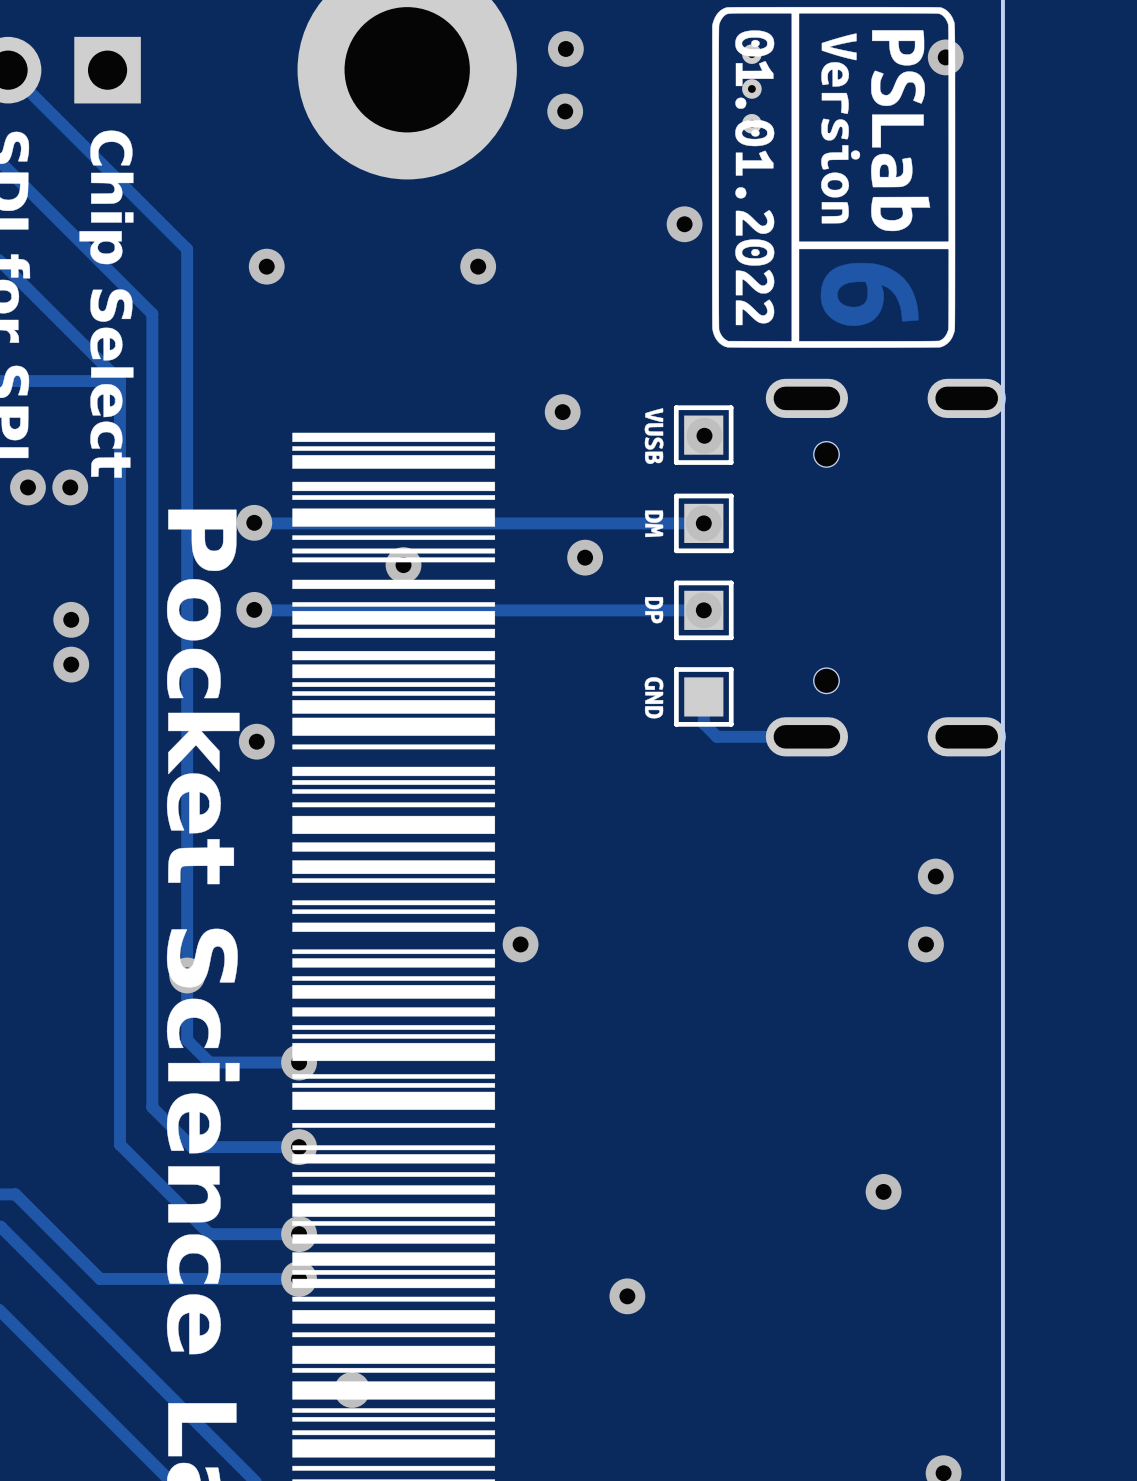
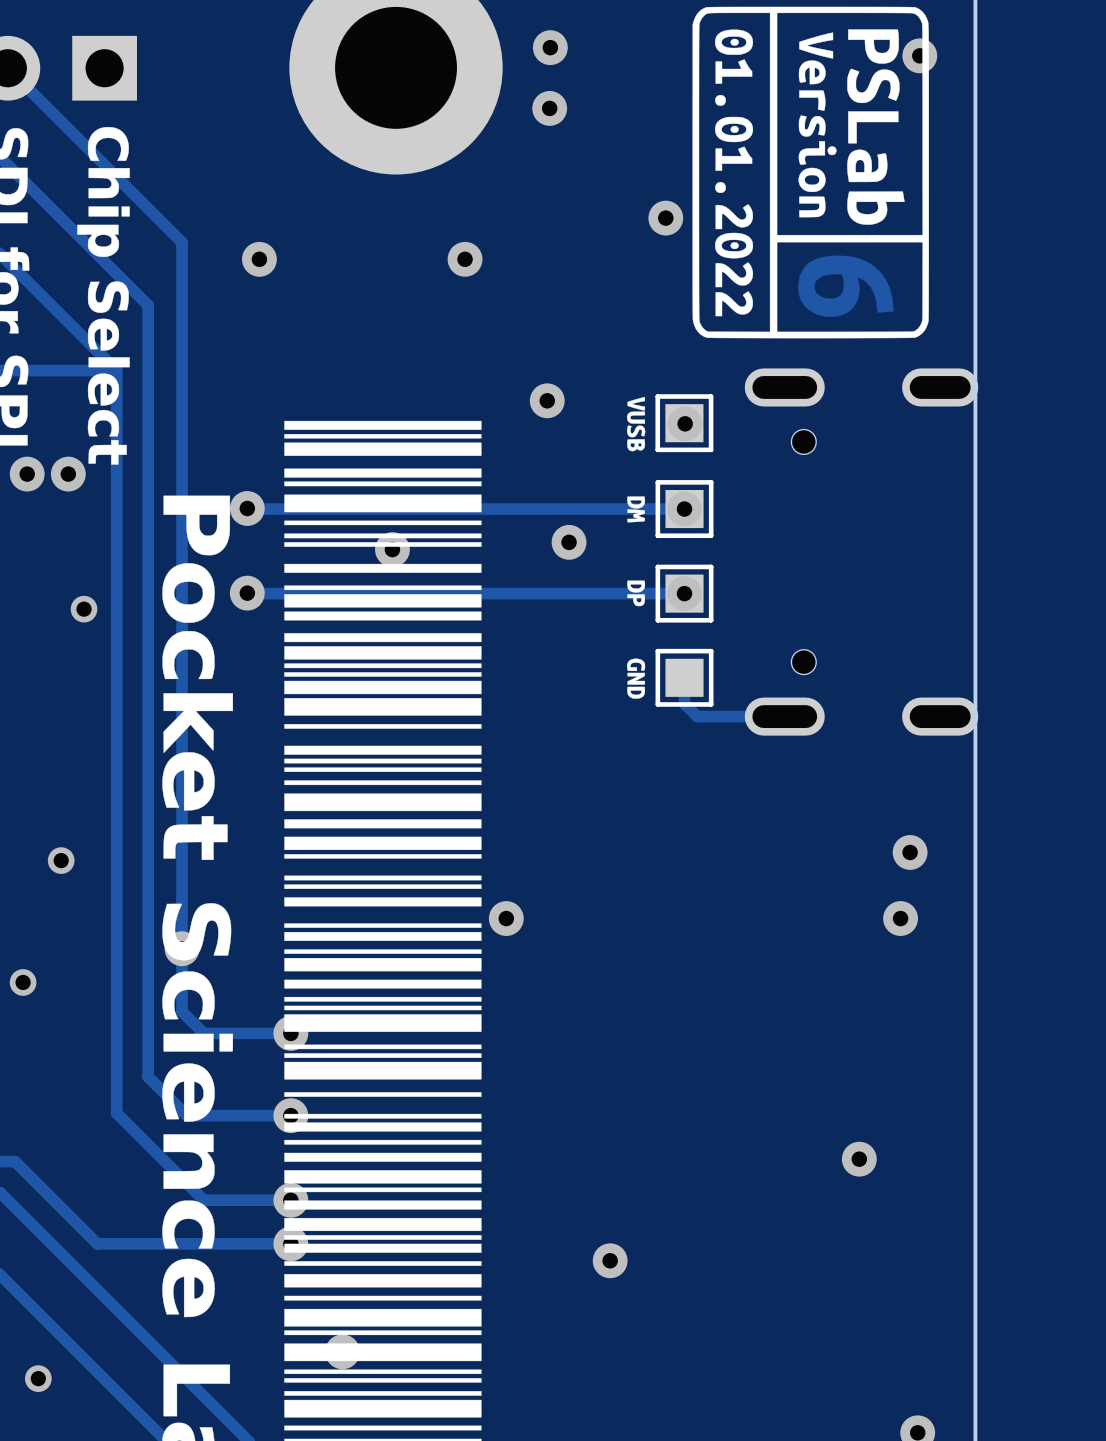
part: (751, 88) -> none
via size: [53, 601, 90, 638] -> [70, 595, 98, 623]
via: (71, 664) -> none
via: (256, 741) -> none
via: none -> (61, 860)
via: none -> (23, 982)
via: none -> (38, 1378)

